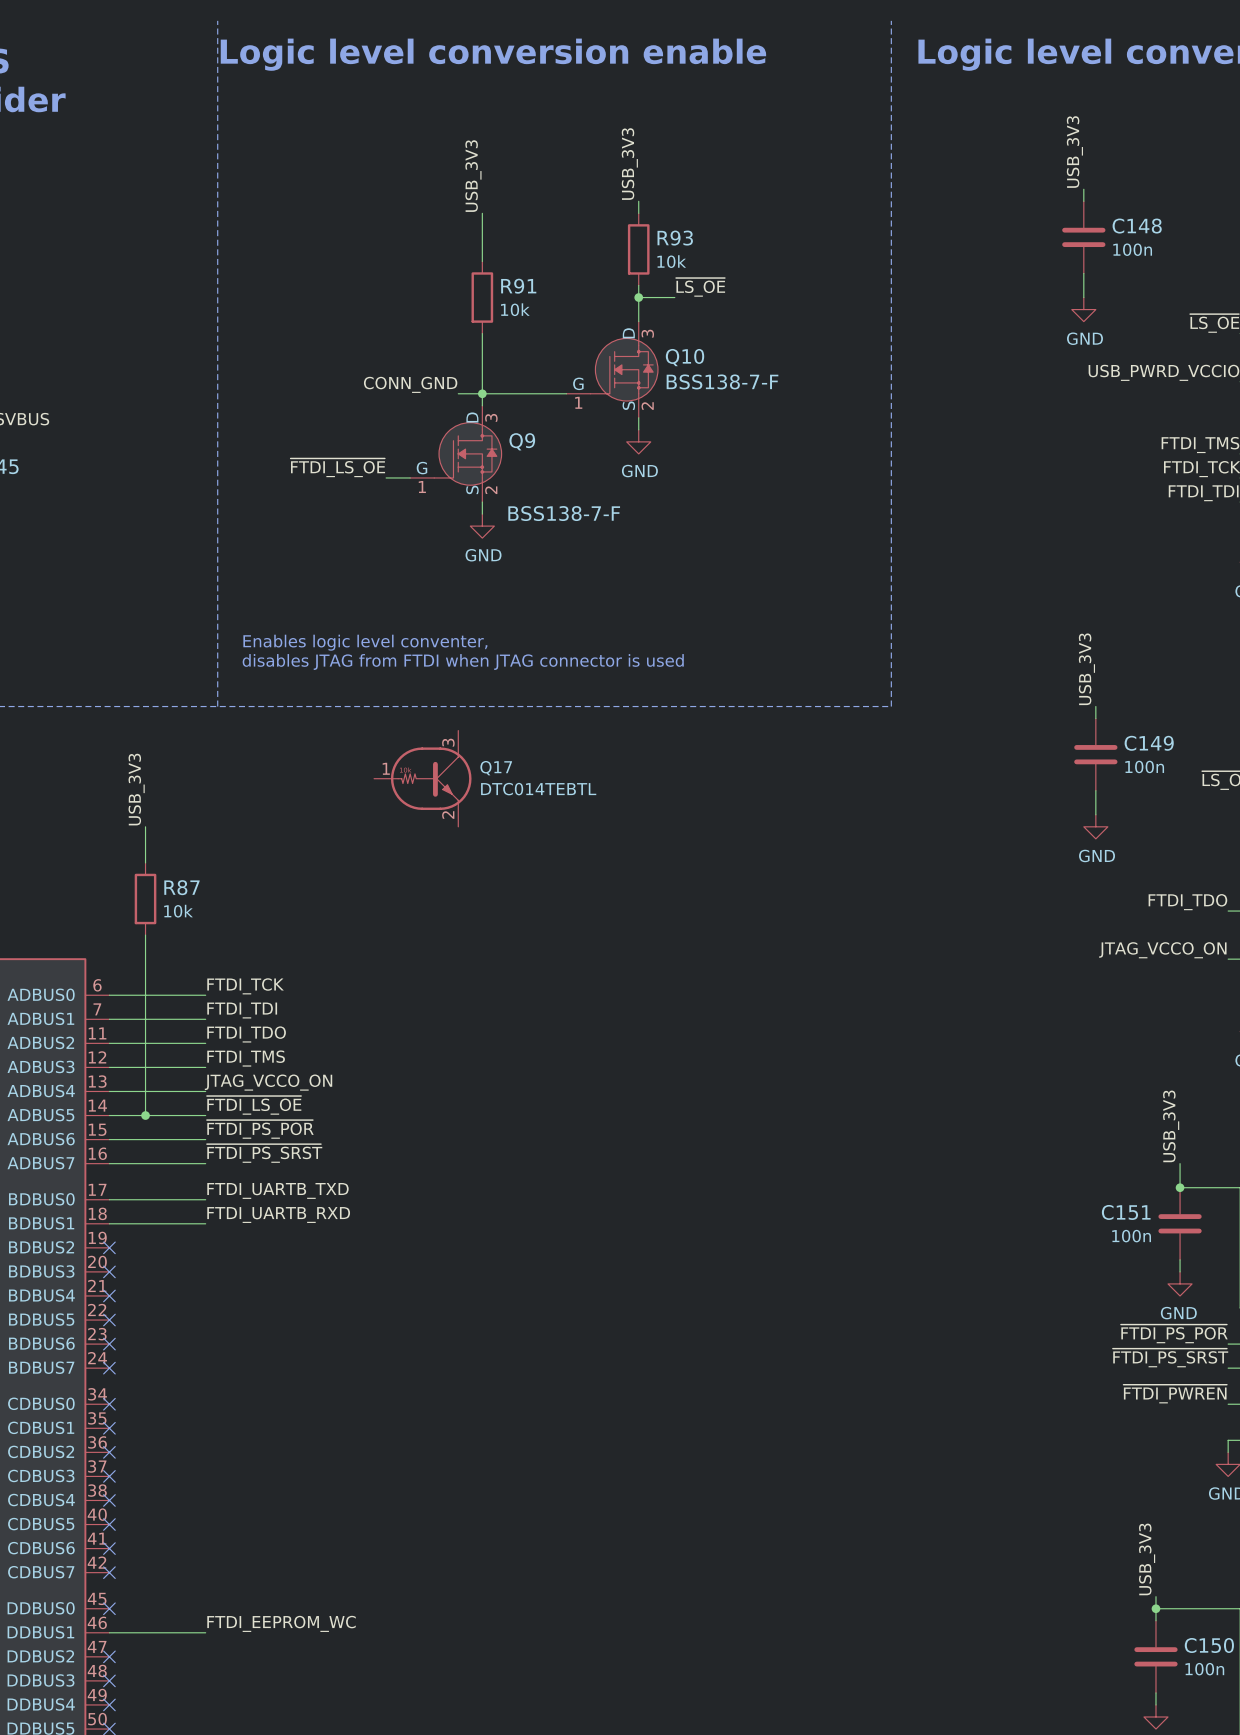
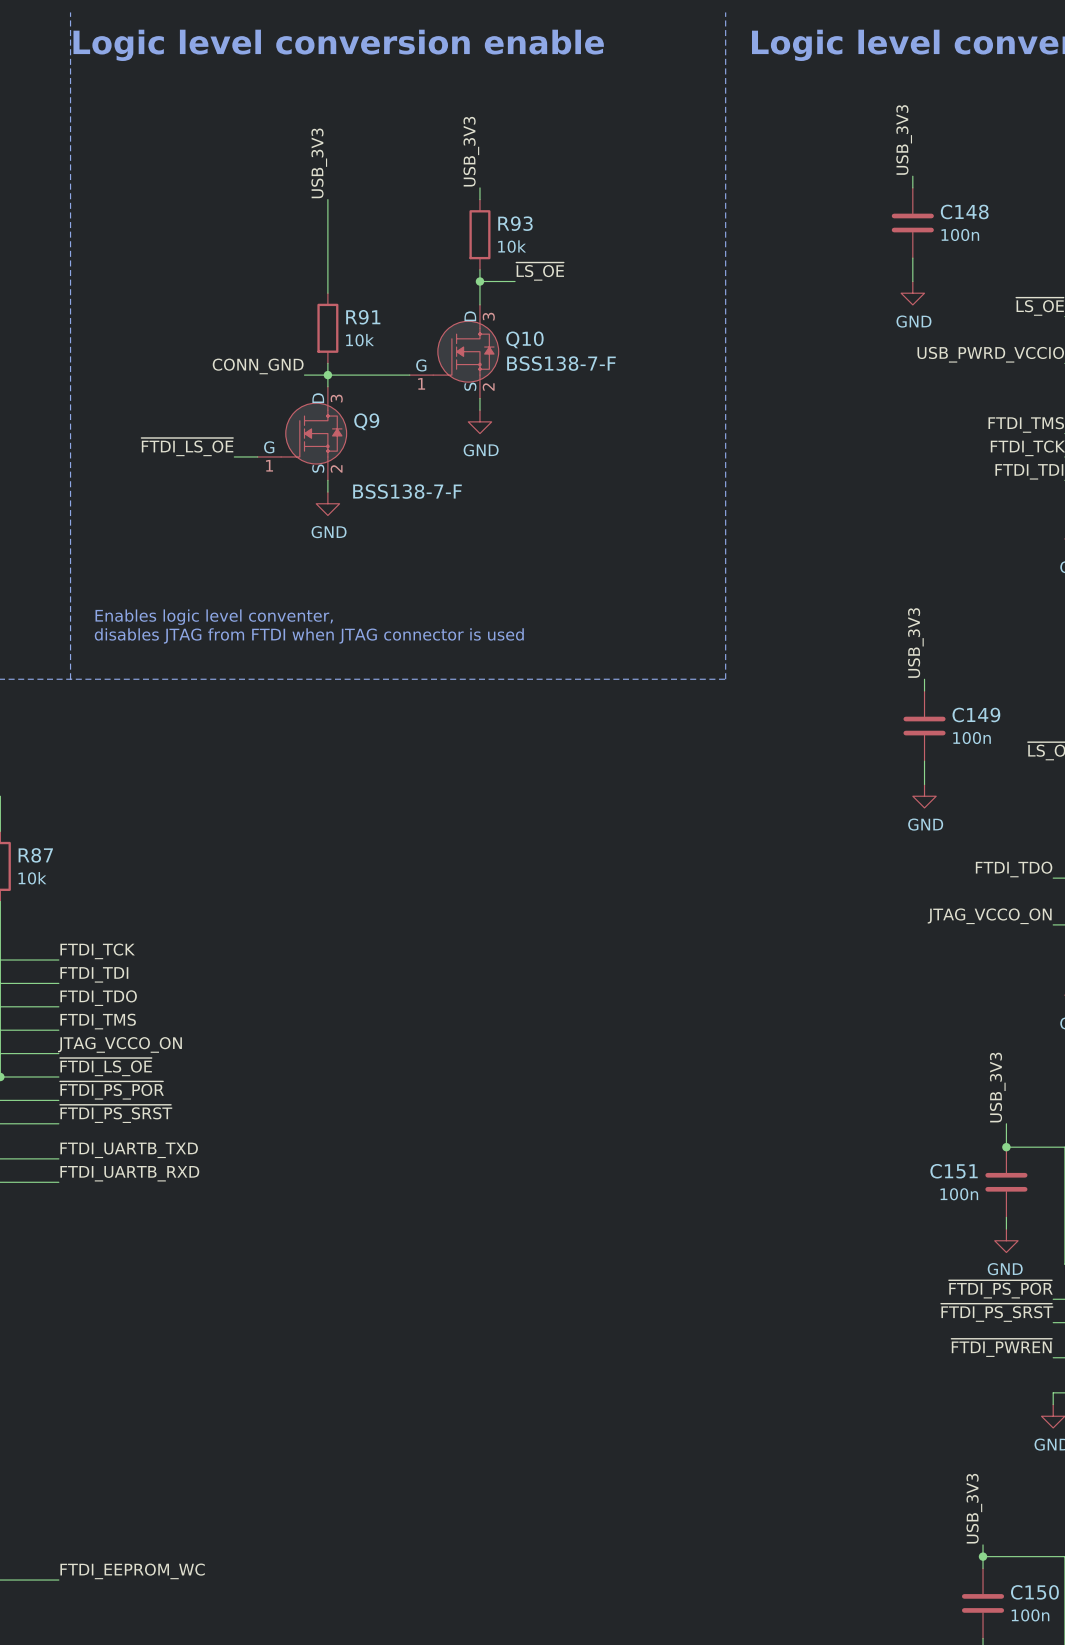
R91 position: (482, 297) -> (327, 328)
wire: (482, 333) (482, 381) -> (327, 246) (327, 293)
Q17: DTC014TEBTL (422, 778) -> none

